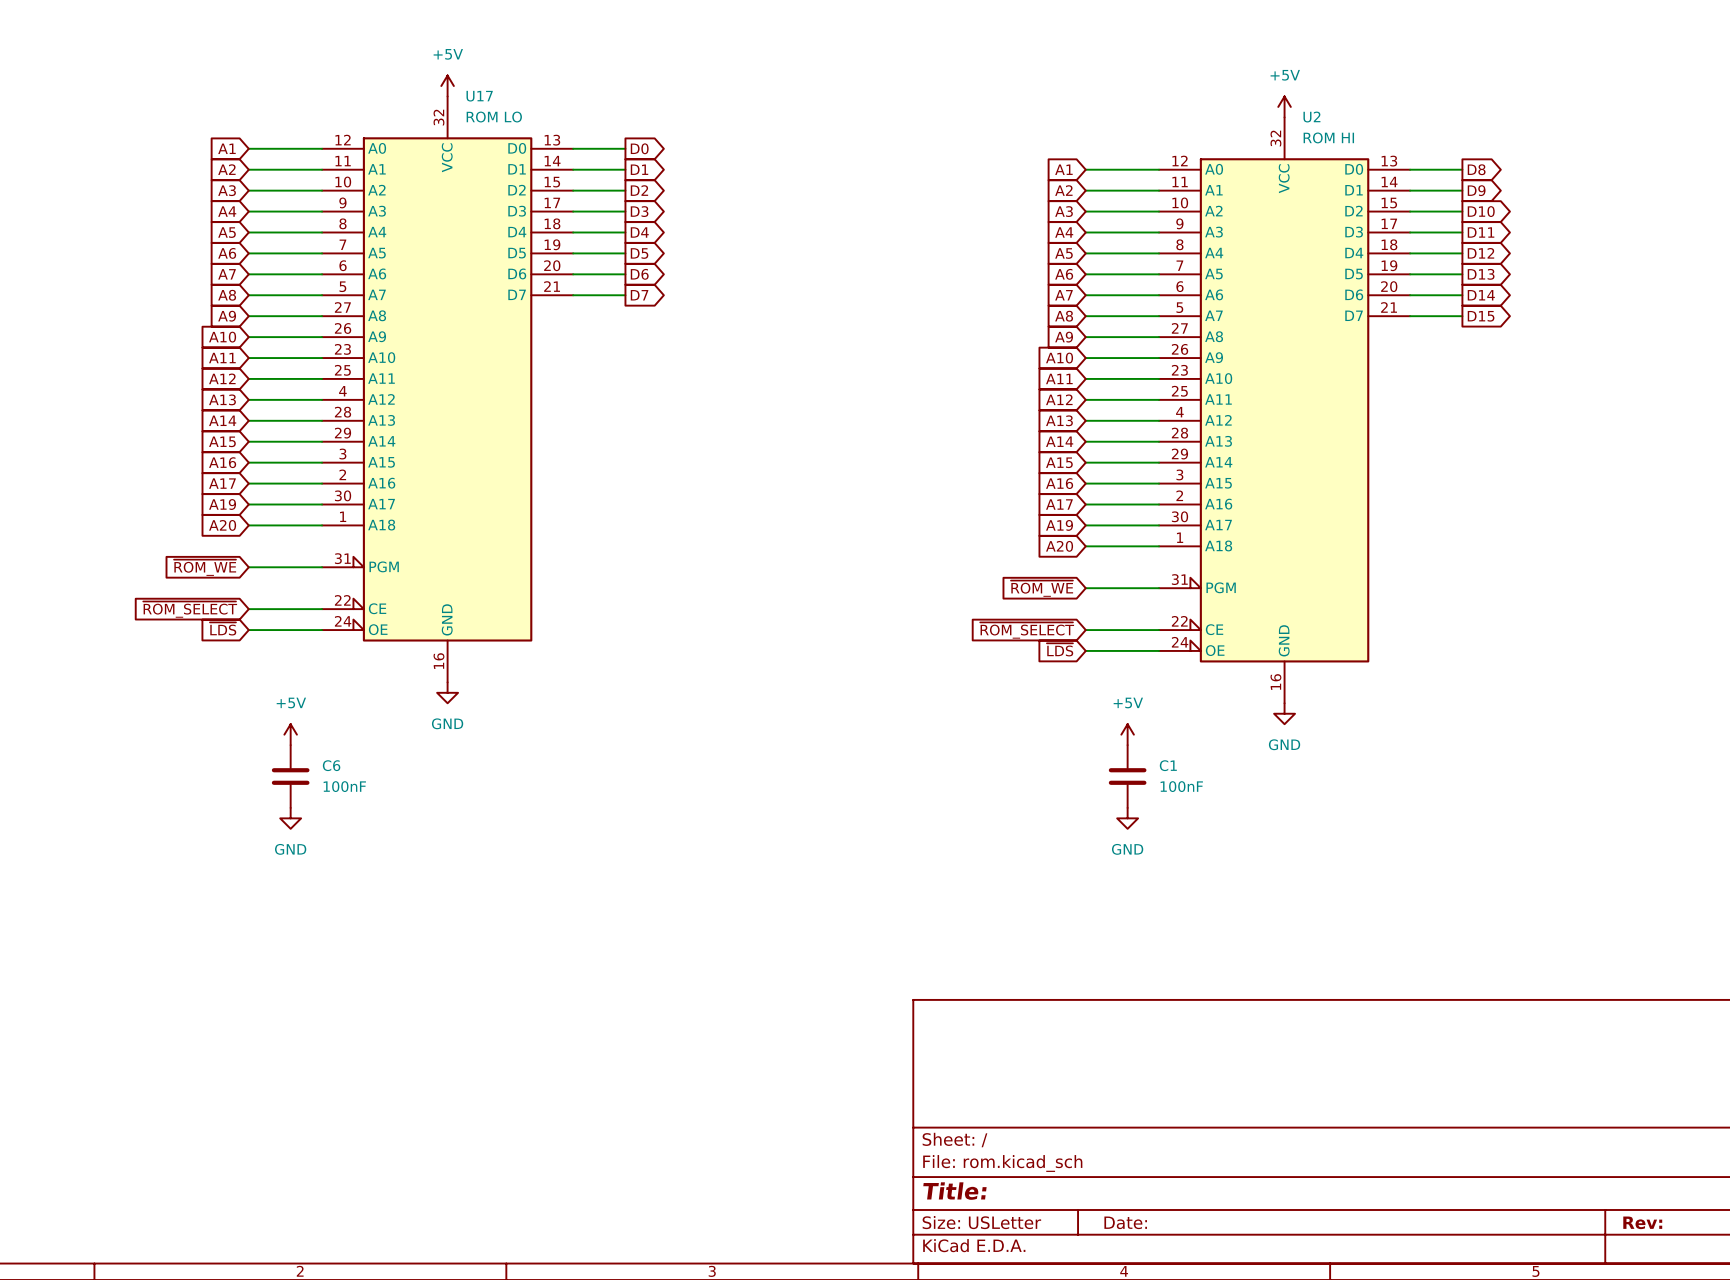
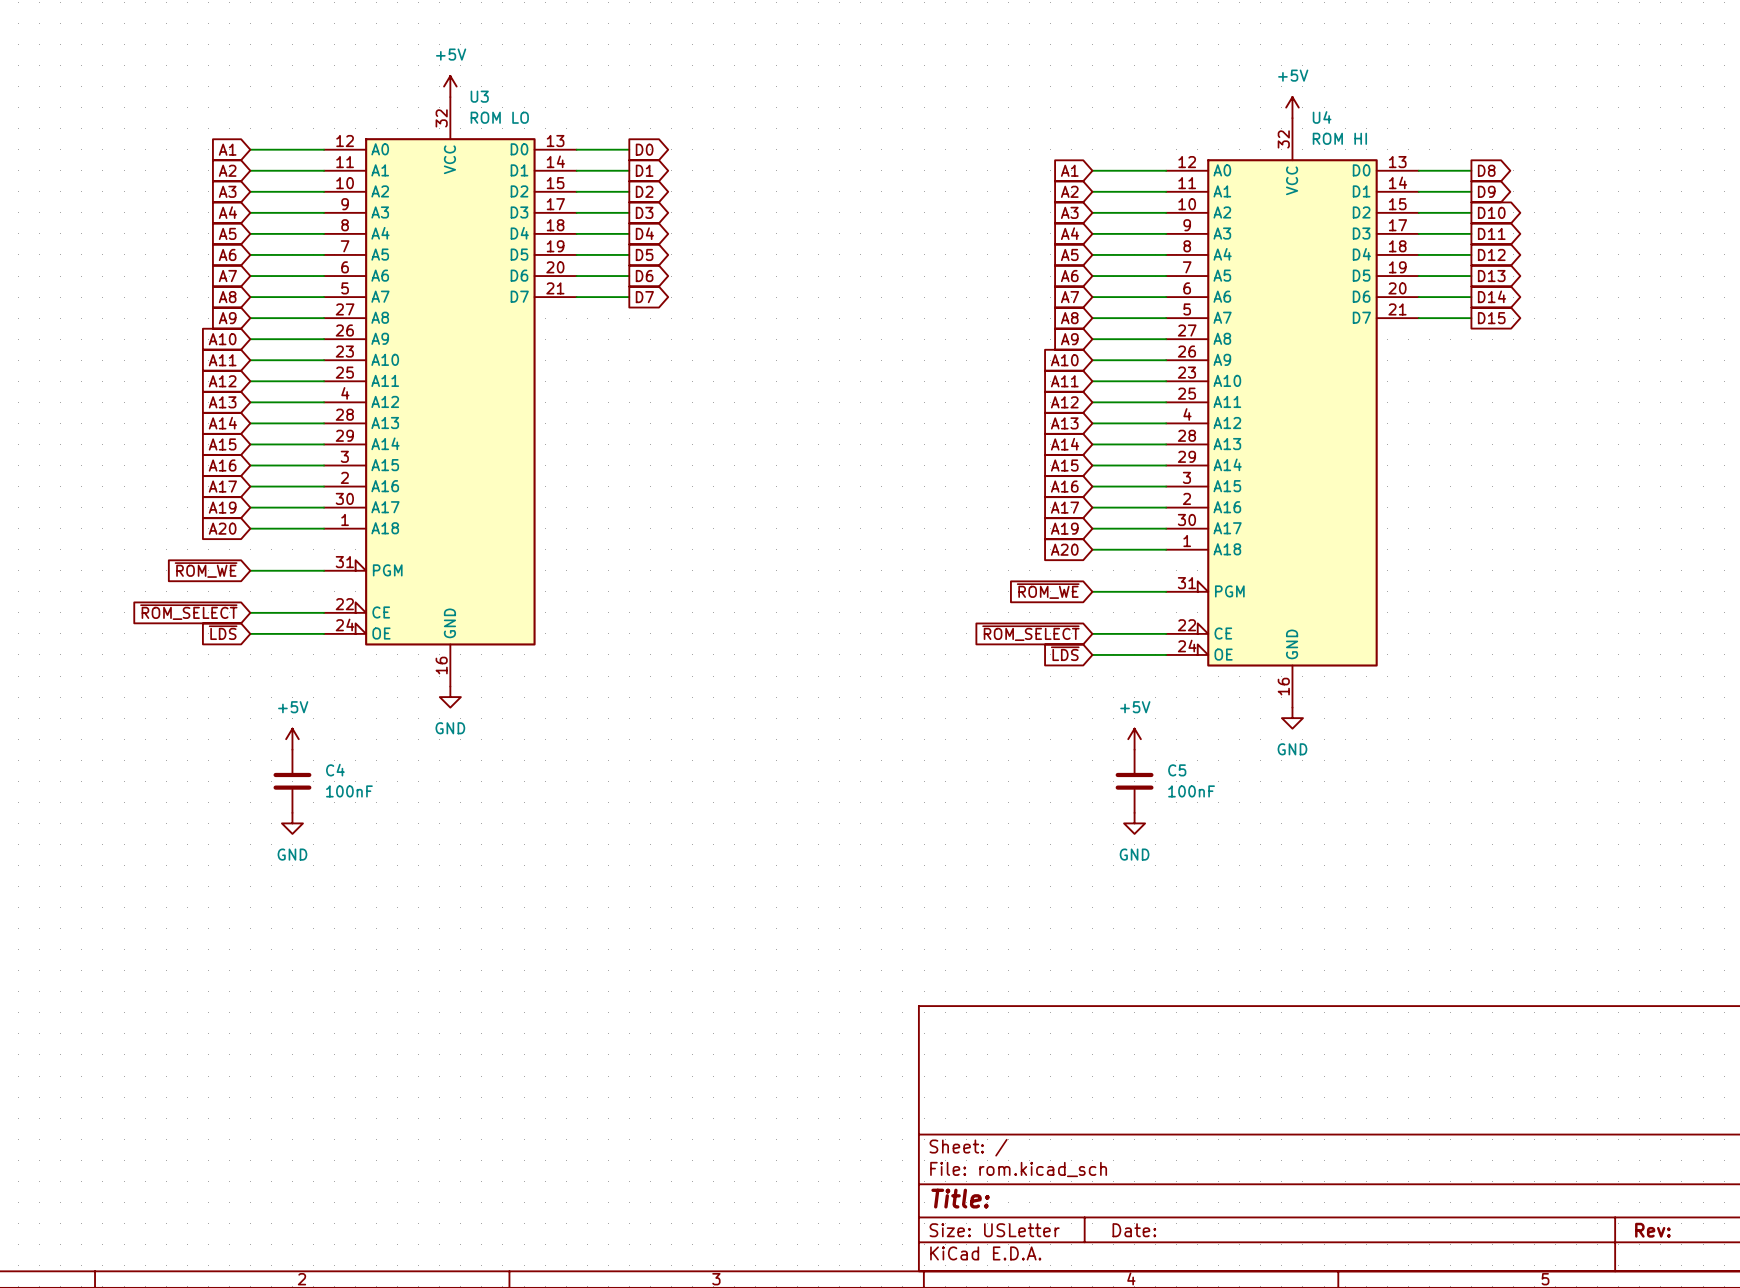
U17 name: U17 (479, 96) -> U3 (479, 96)
U2 name: U2 (1311, 117) -> U4 (1322, 117)
C6 name: C6 (331, 765) -> C4 (335, 770)
C1 name: C1 (1168, 765) -> C5 (1177, 770)

